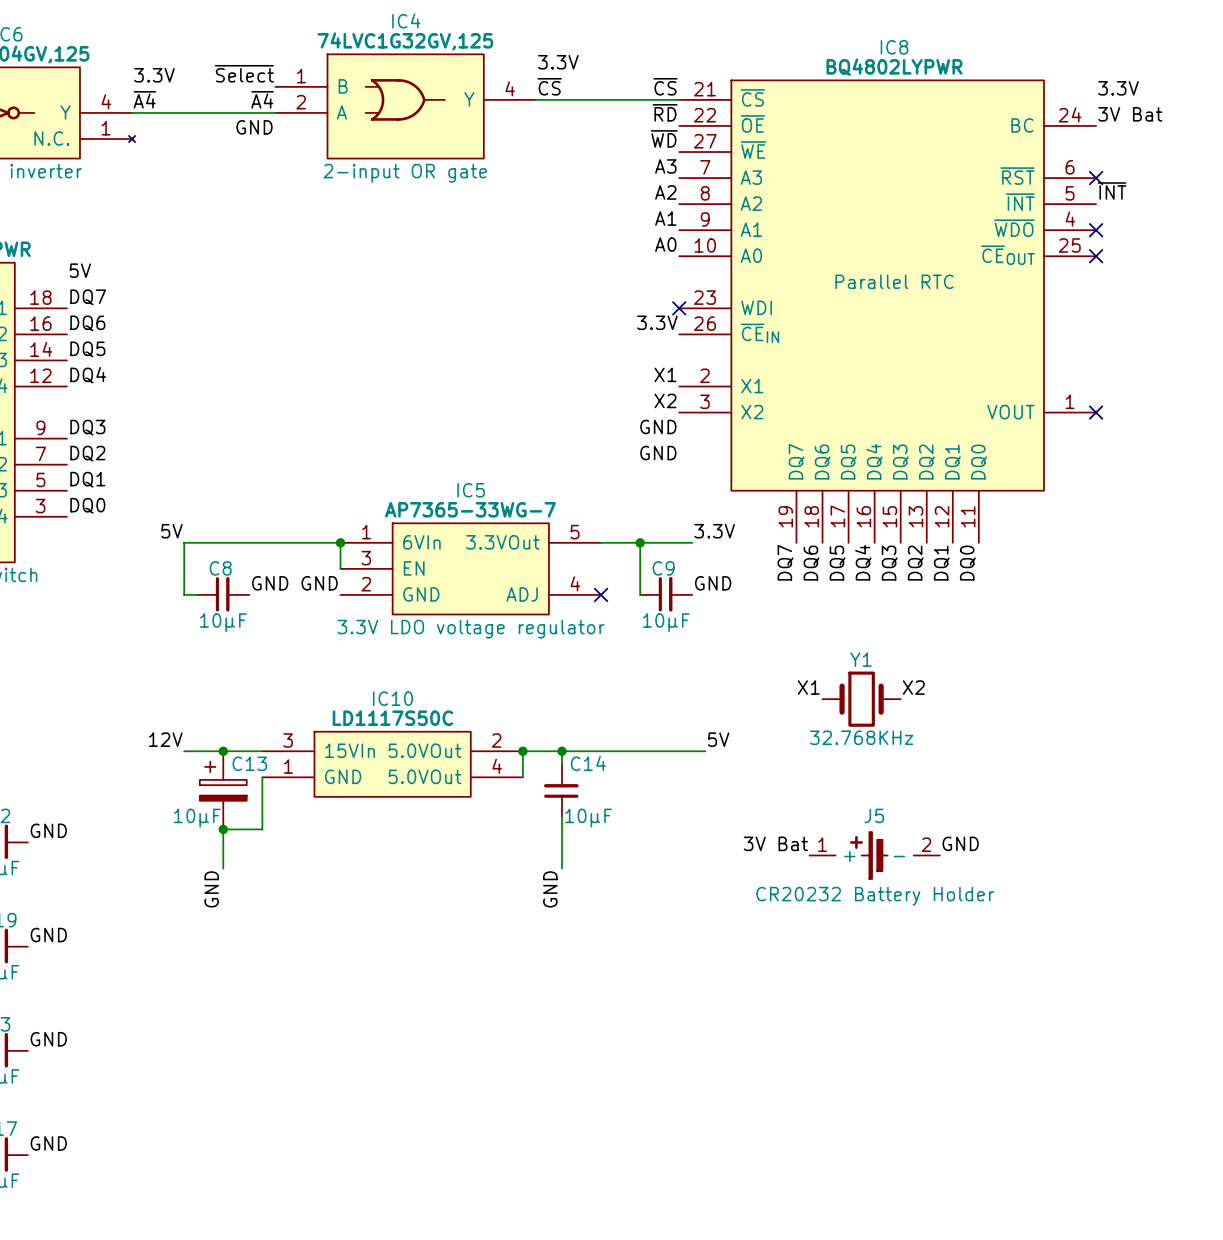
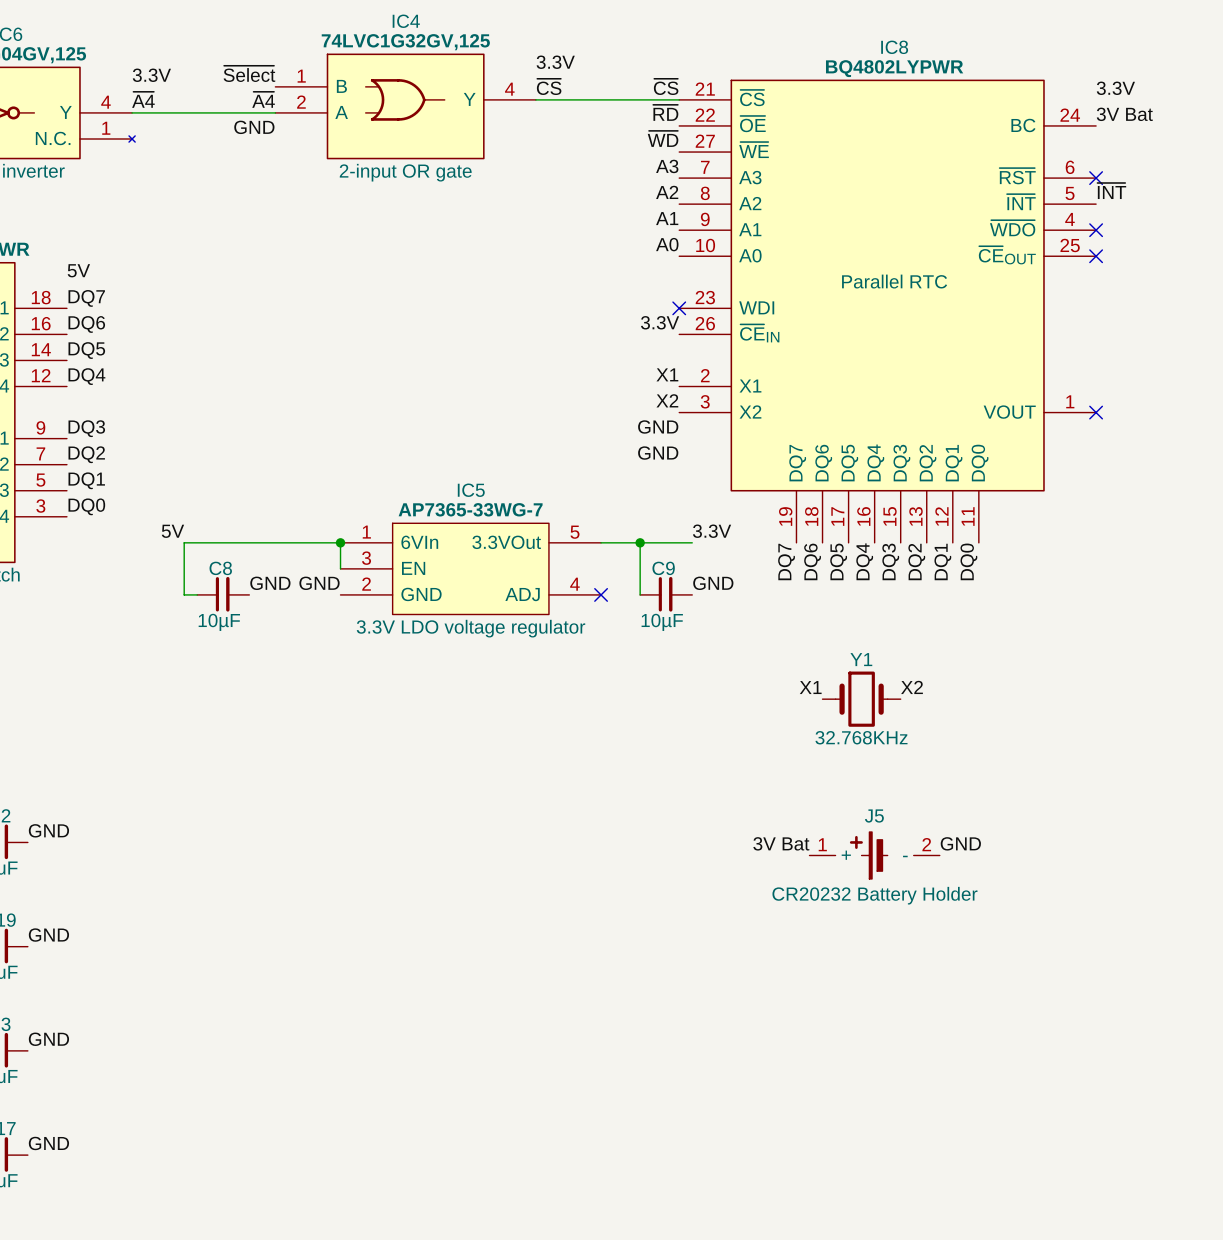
label: 12V (165, 739) -> none
label: 5V (718, 739) -> none
wire: (184, 751) (262, 751) -> none
junction: (223, 751) -> none
junction: (522, 751) -> none
wire: (561, 751) (561, 764) -> none
junction: (561, 751) -> none
wire: (705, 751) (522, 751) (522, 777) -> none
IC10: LD1117S50C (392, 764) -> none
wire: (262, 777) (262, 829) (223, 829) (223, 868) -> none
C13: 10μF (223, 790) -> none
C14: 10µF (561, 790) -> none
wire: (561, 816) (561, 868) -> none
junction: (223, 829) -> none
label: GND (211, 889) -> none
label: GND (550, 889) -> none

